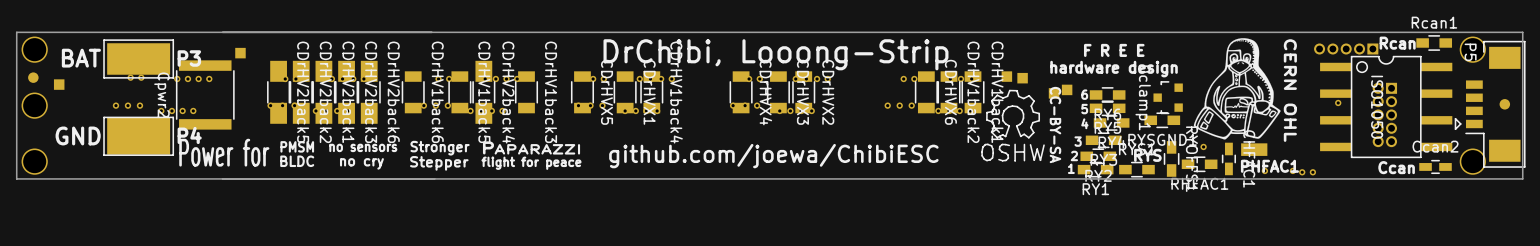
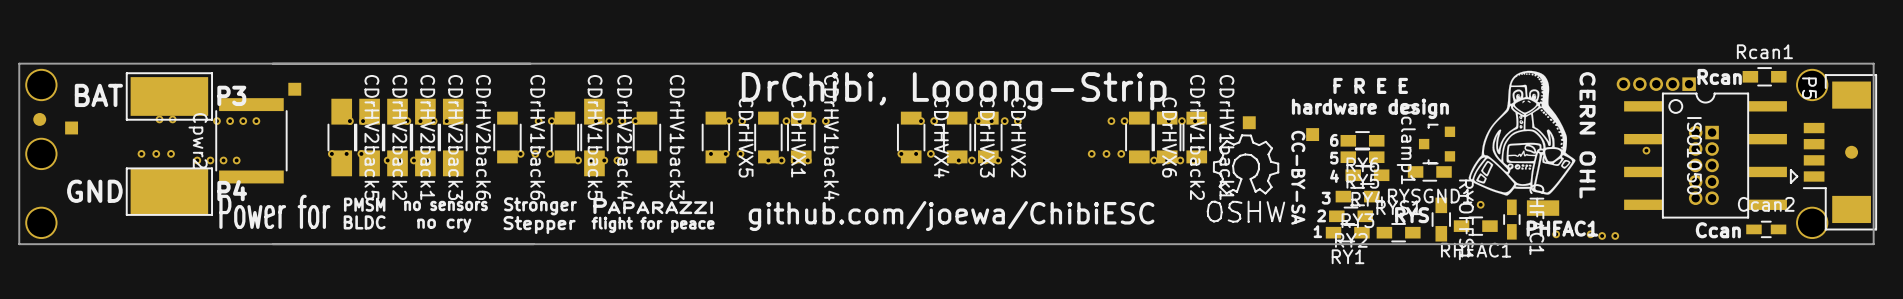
part: (1006, 76) -> none
part: (1022, 78) -> none
part: none -> (1249, 122)
part: (1054, 93) -> none

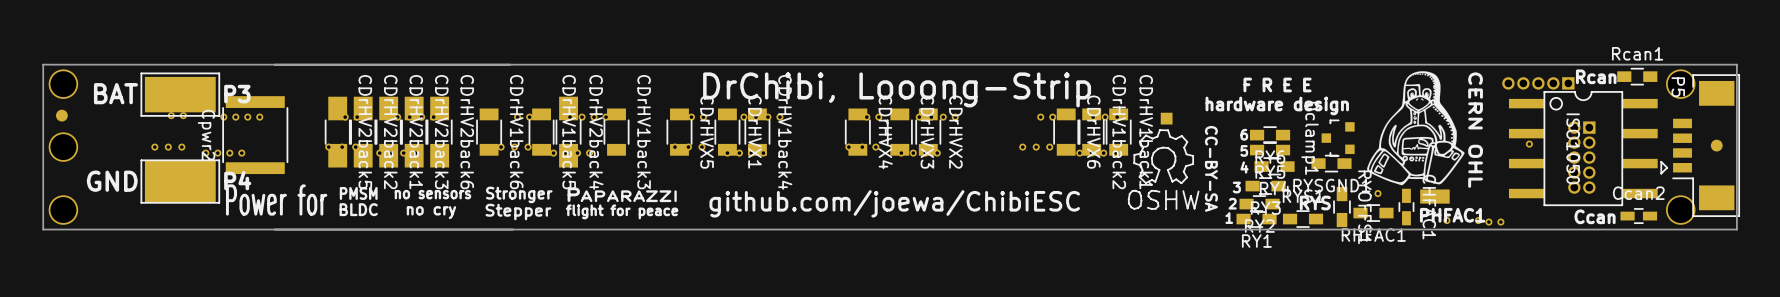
part: (294, 89) -> none
part: (71, 127) -> none
part: (1312, 134) -> none

